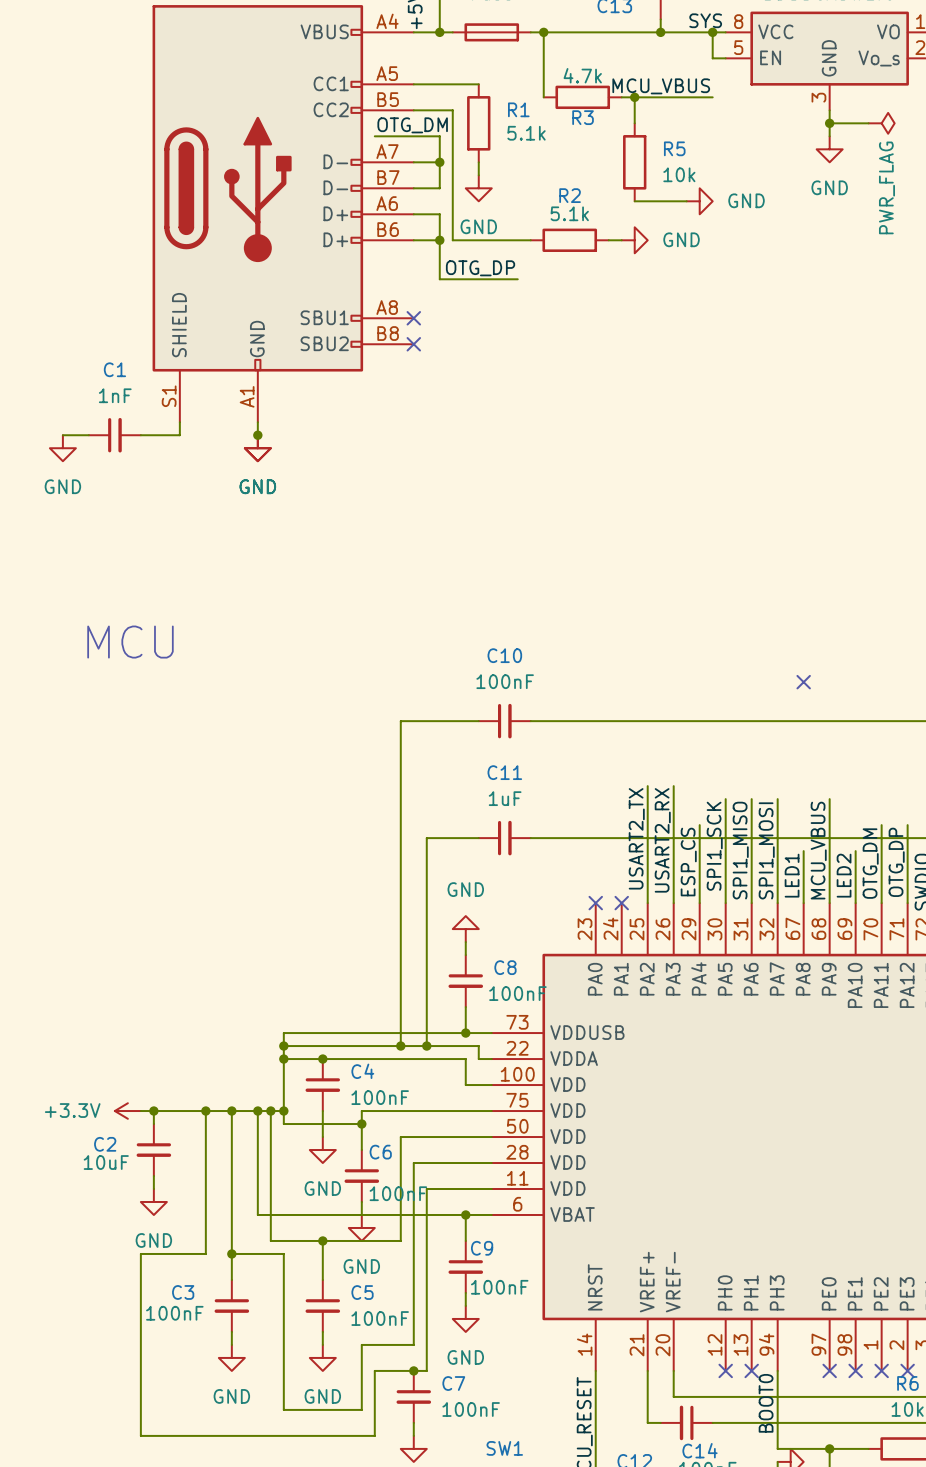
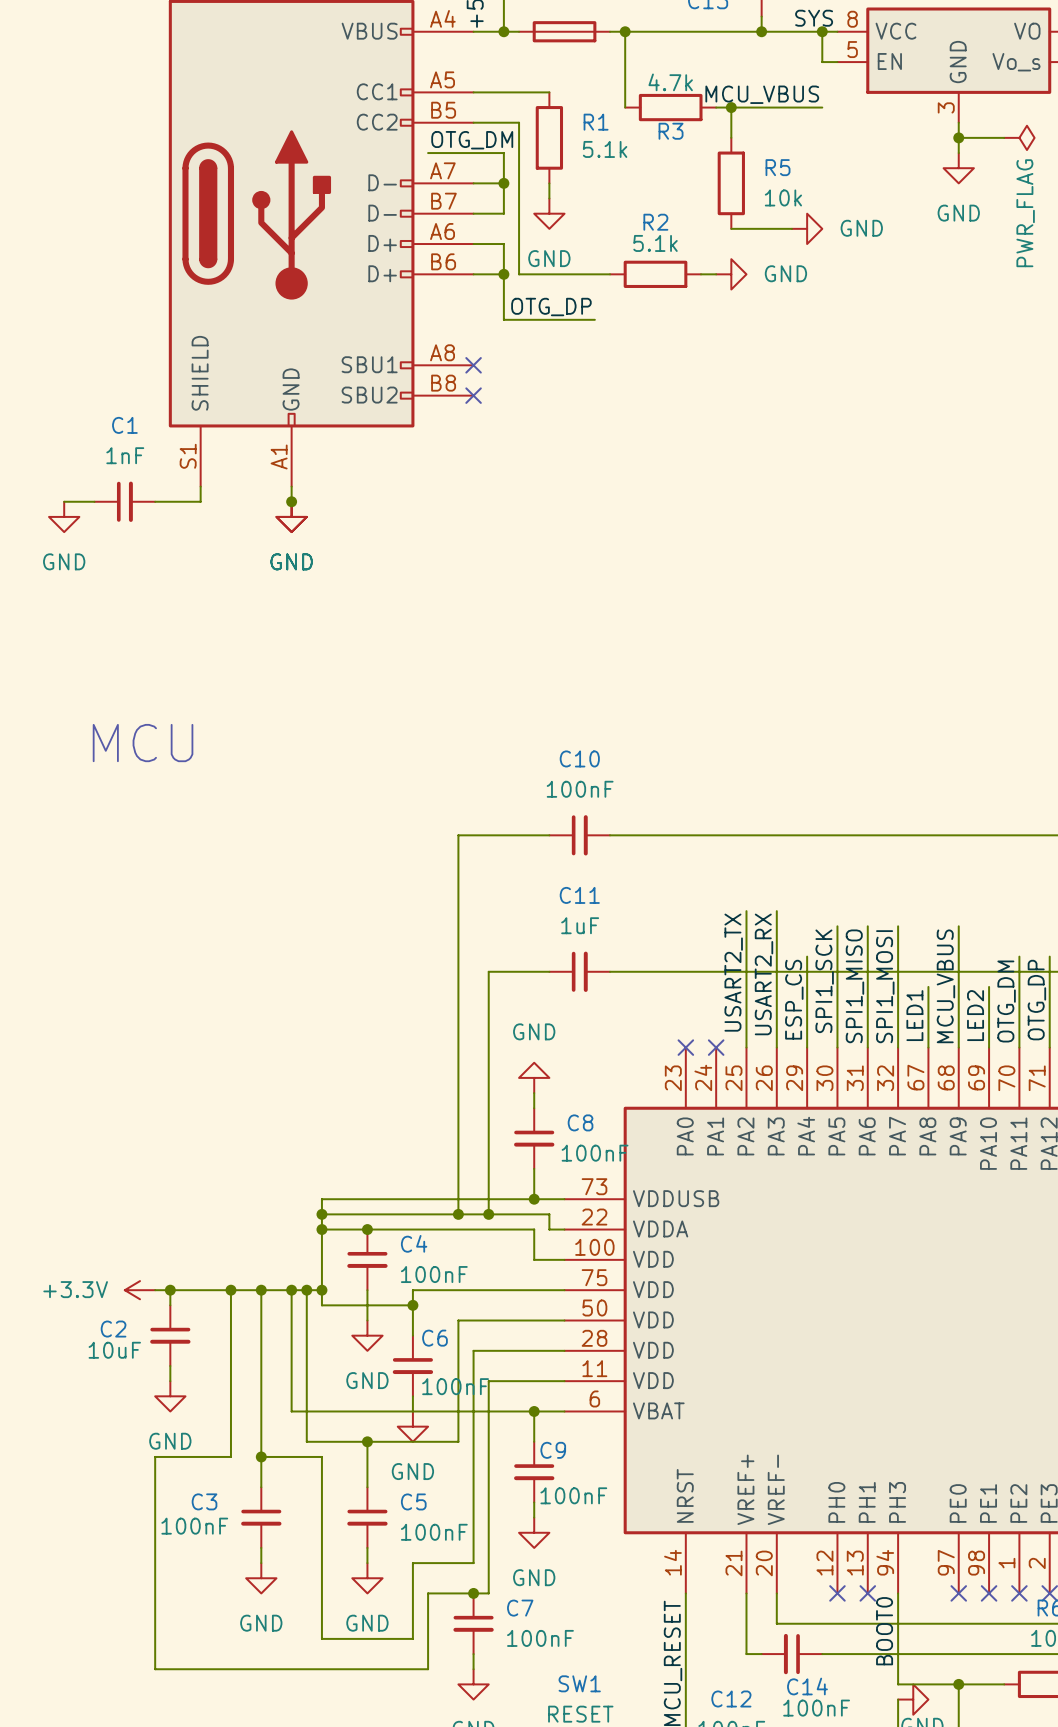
no-connect mark: (803, 682) -> none

